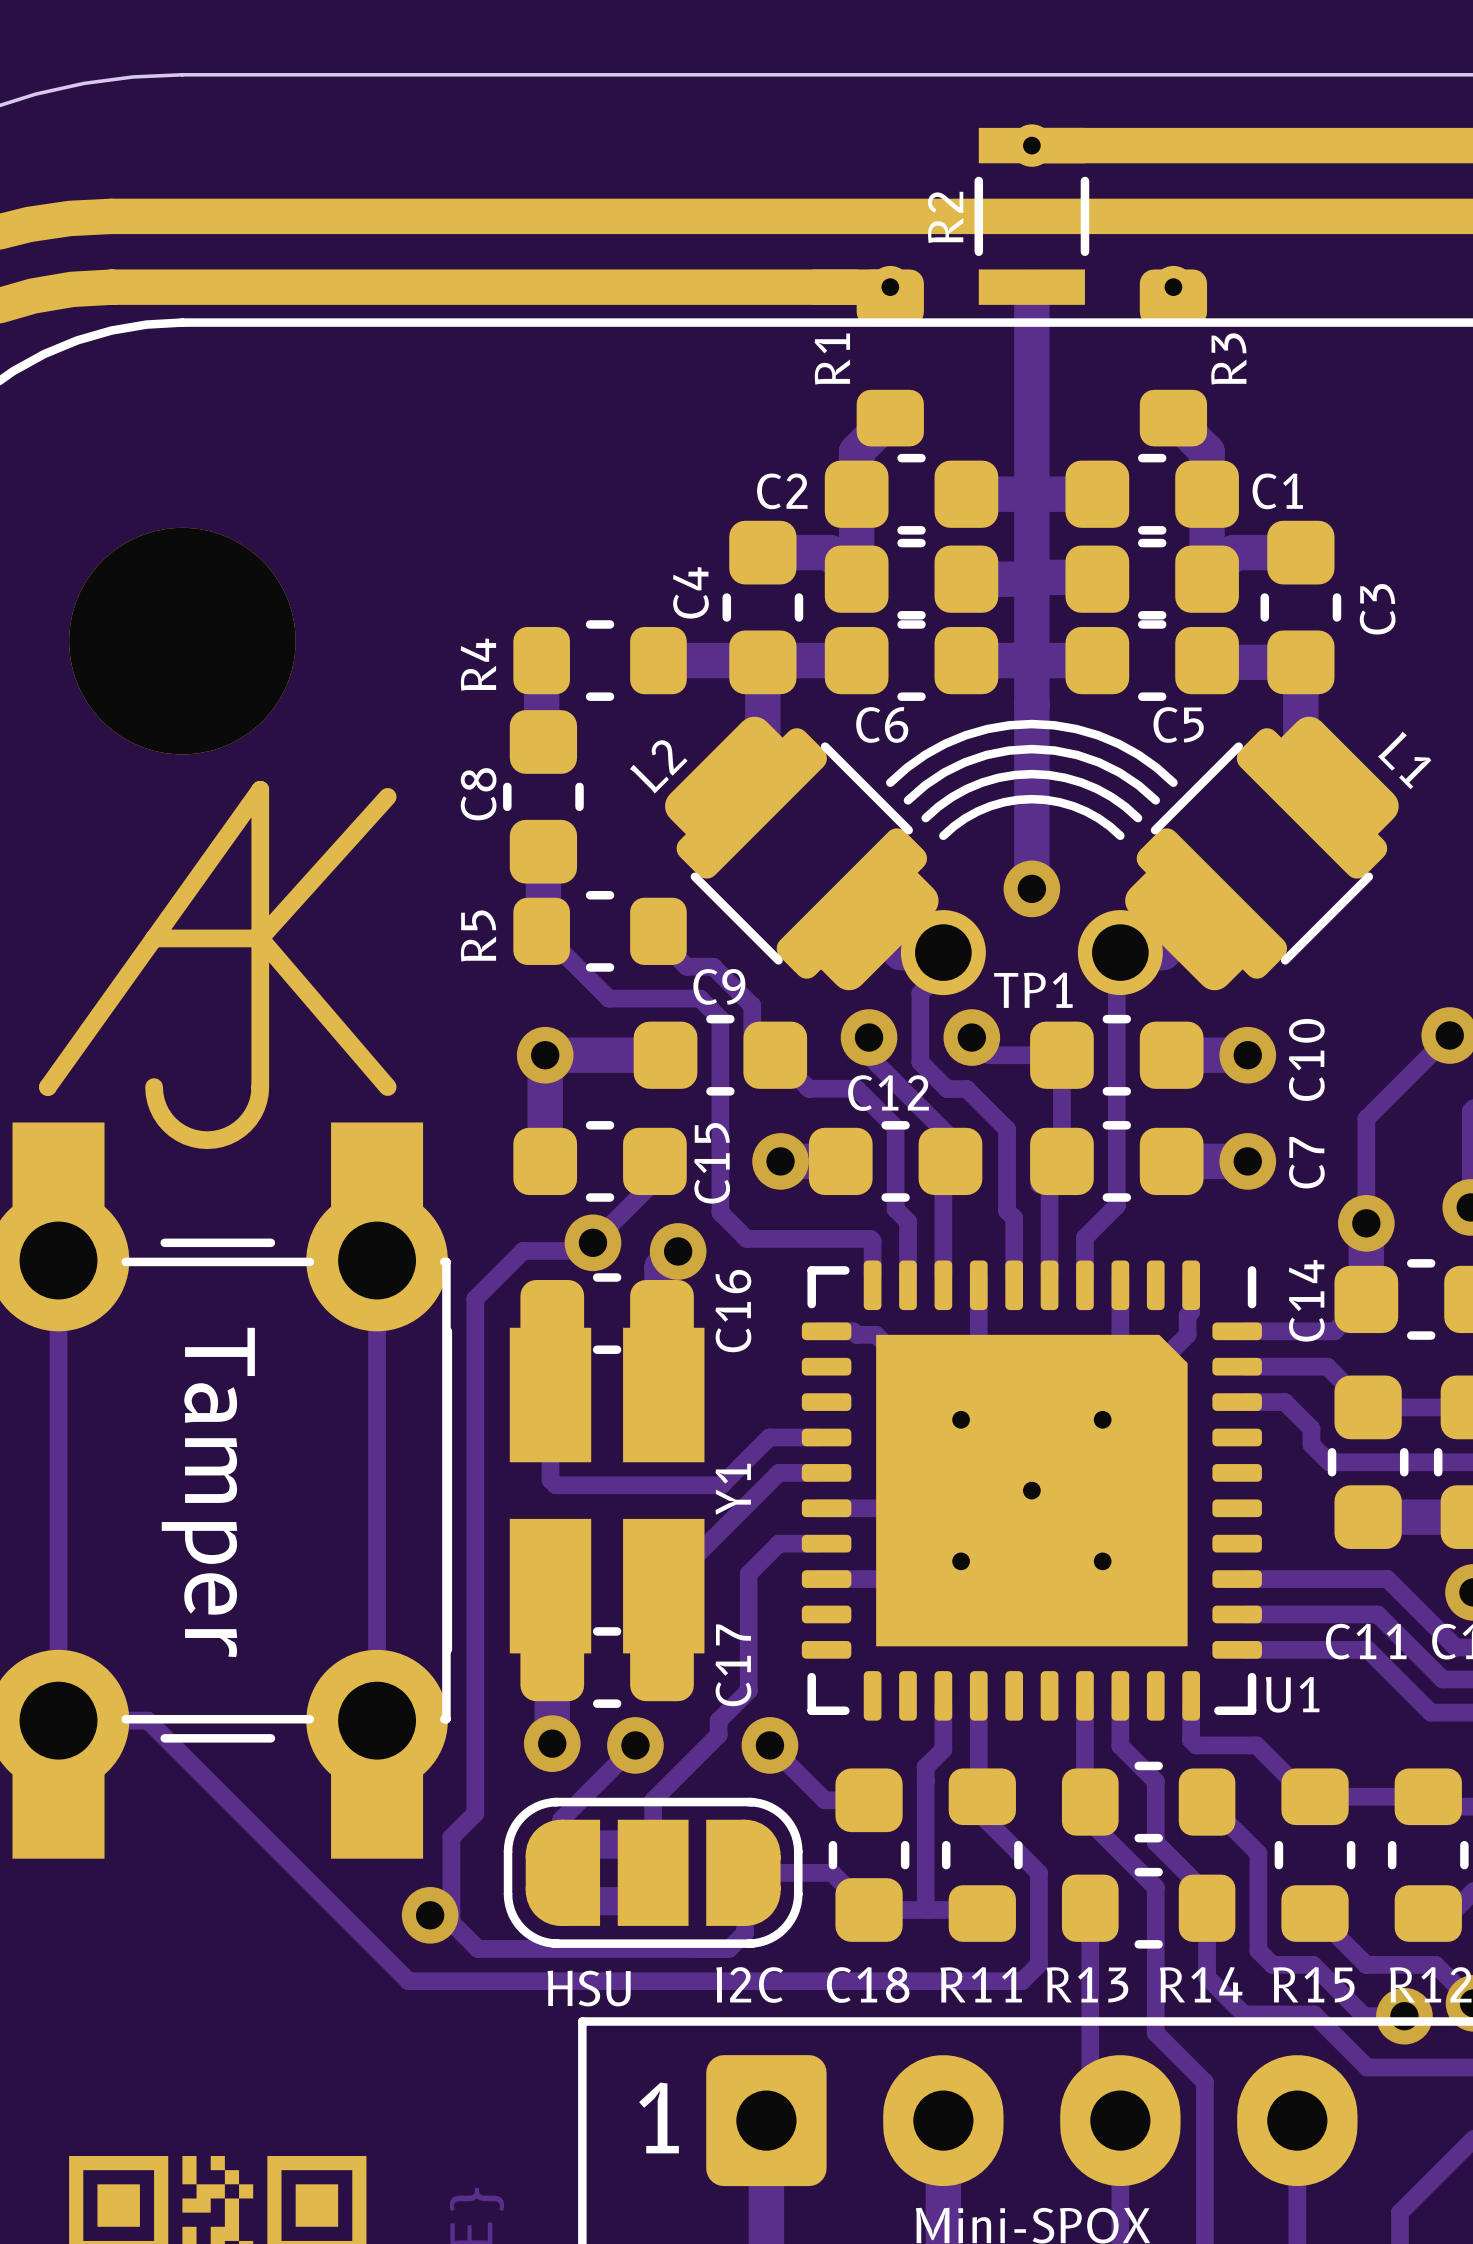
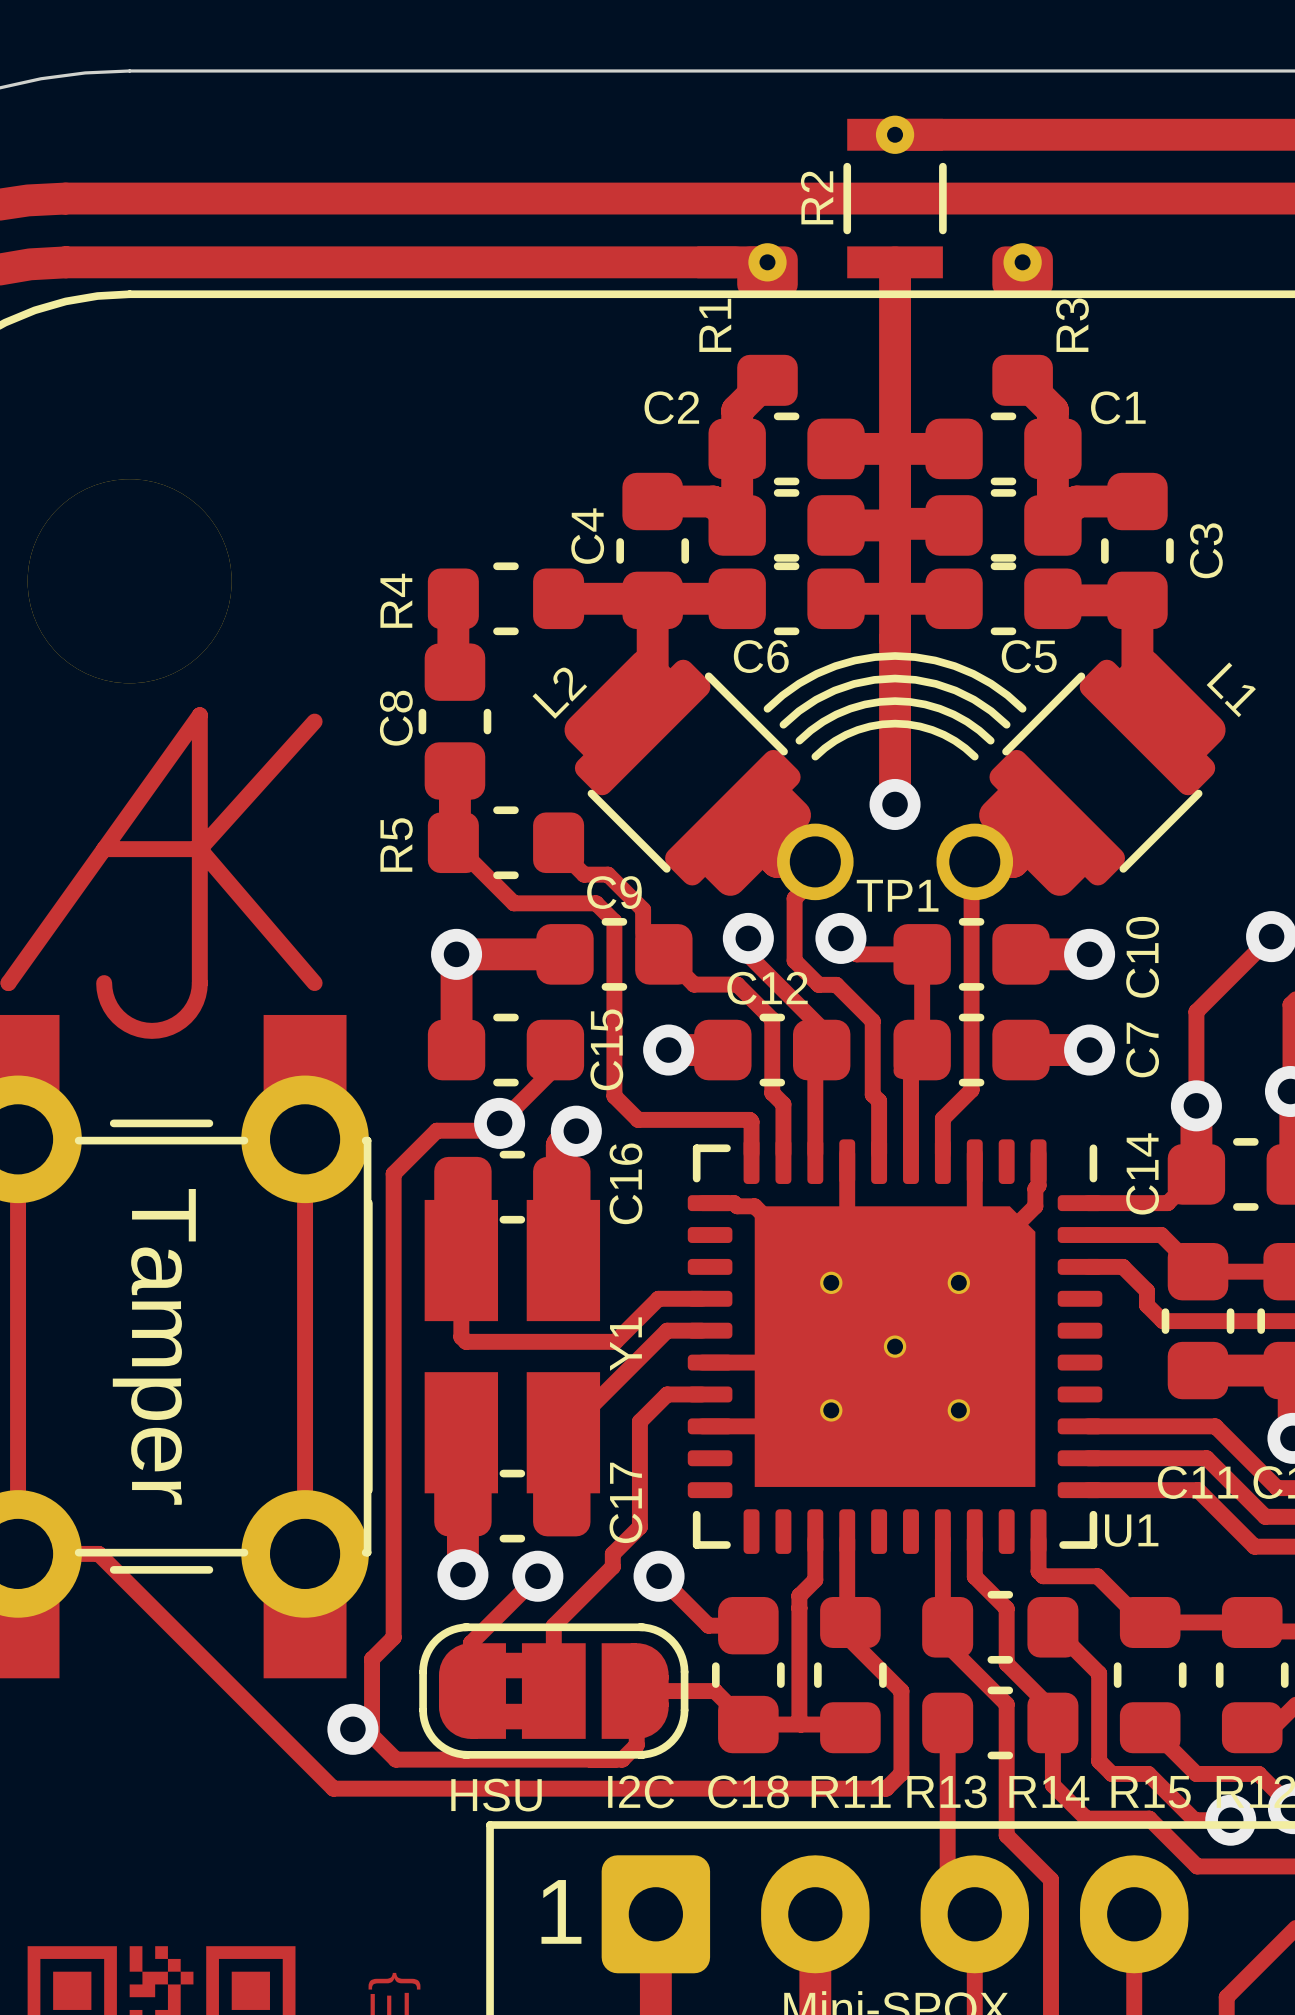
C2 name position: C2 (782, 491) -> C2 (671, 407)
C1 name position: C1 (1277, 491) -> C1 (1118, 407)

